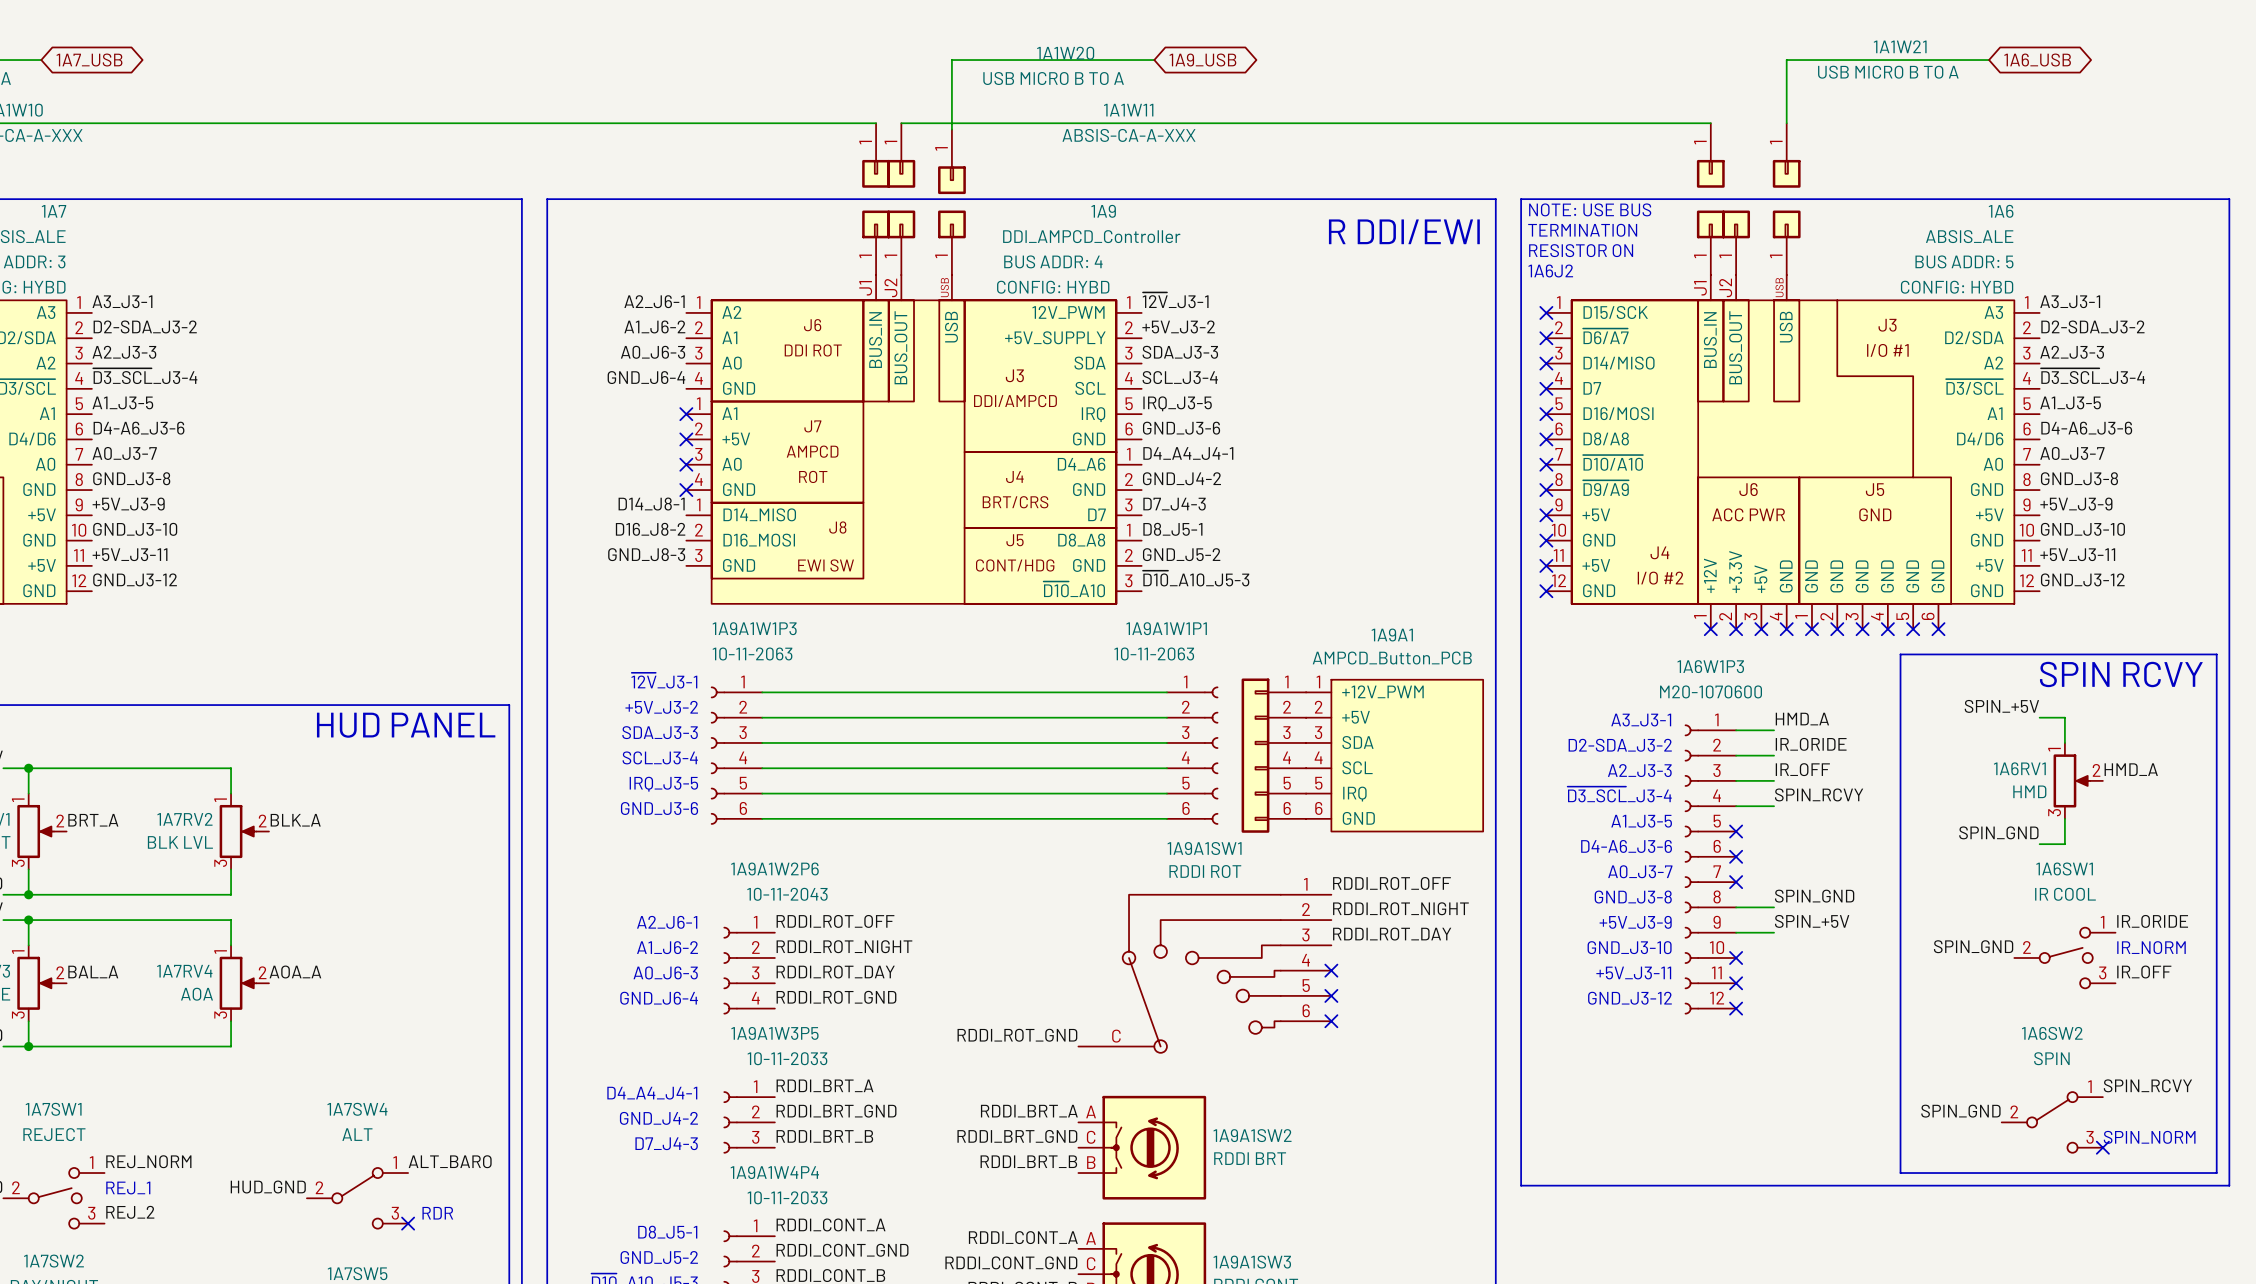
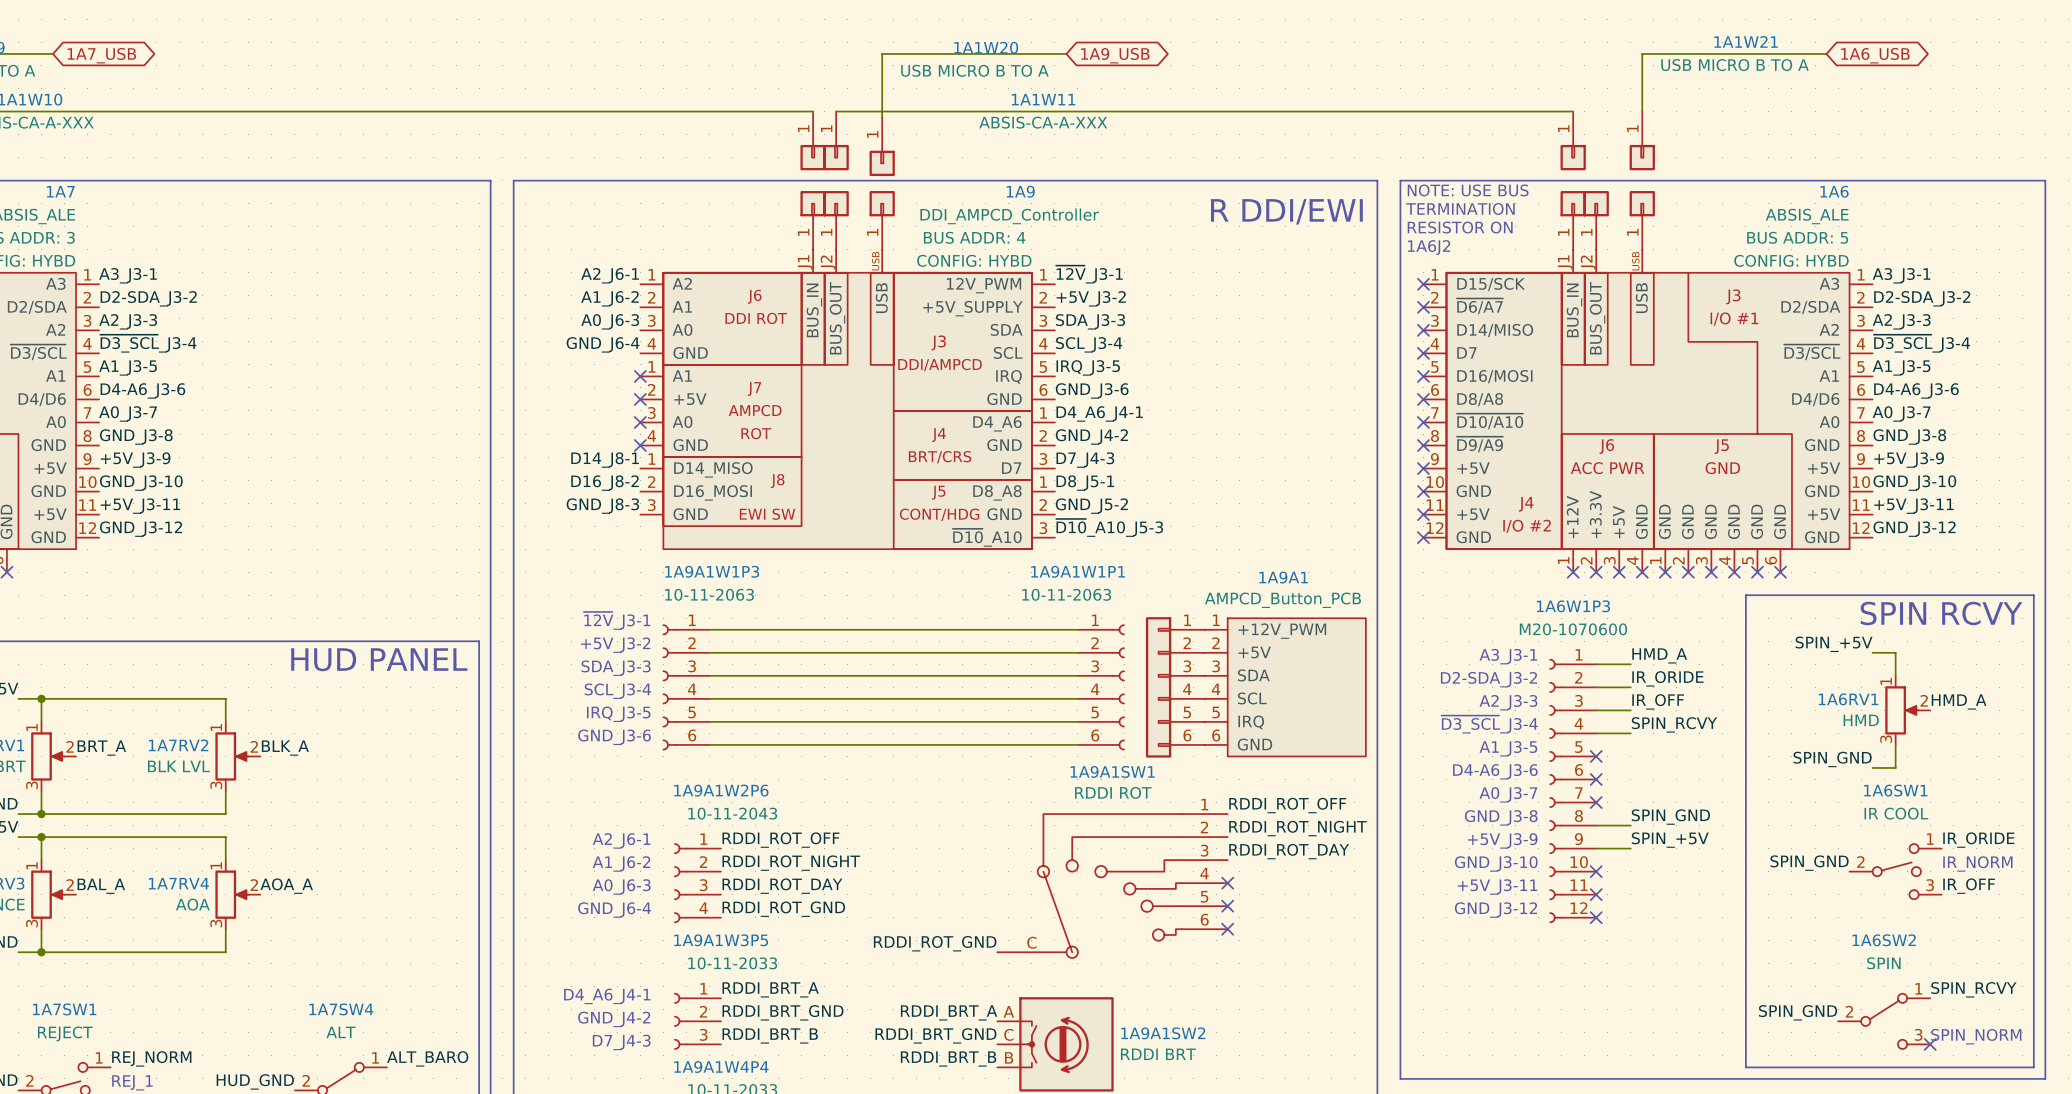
label: D4_A4_J4-1 (1188, 453) -> D4_A6_J4-1 (1099, 413)
text: D4_A4_J4-1 (652, 1093) -> D4_A6_J4-1 (607, 996)

